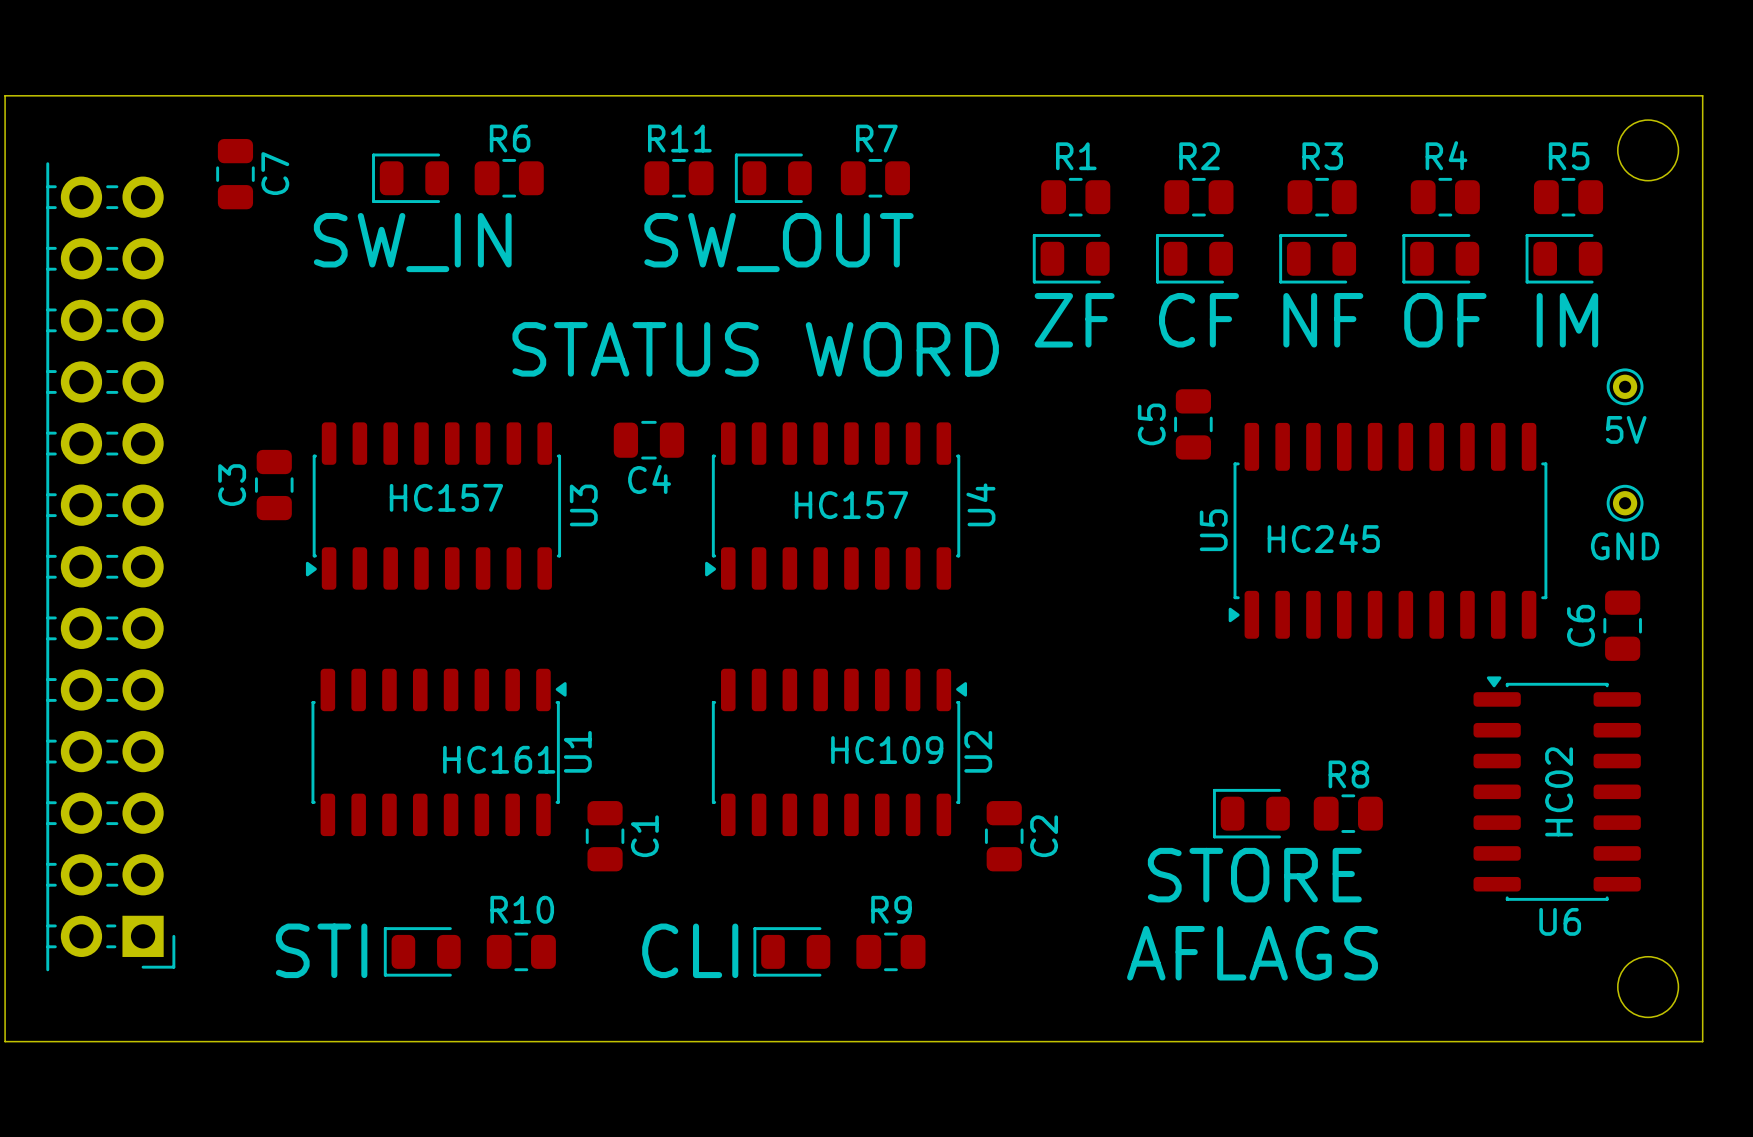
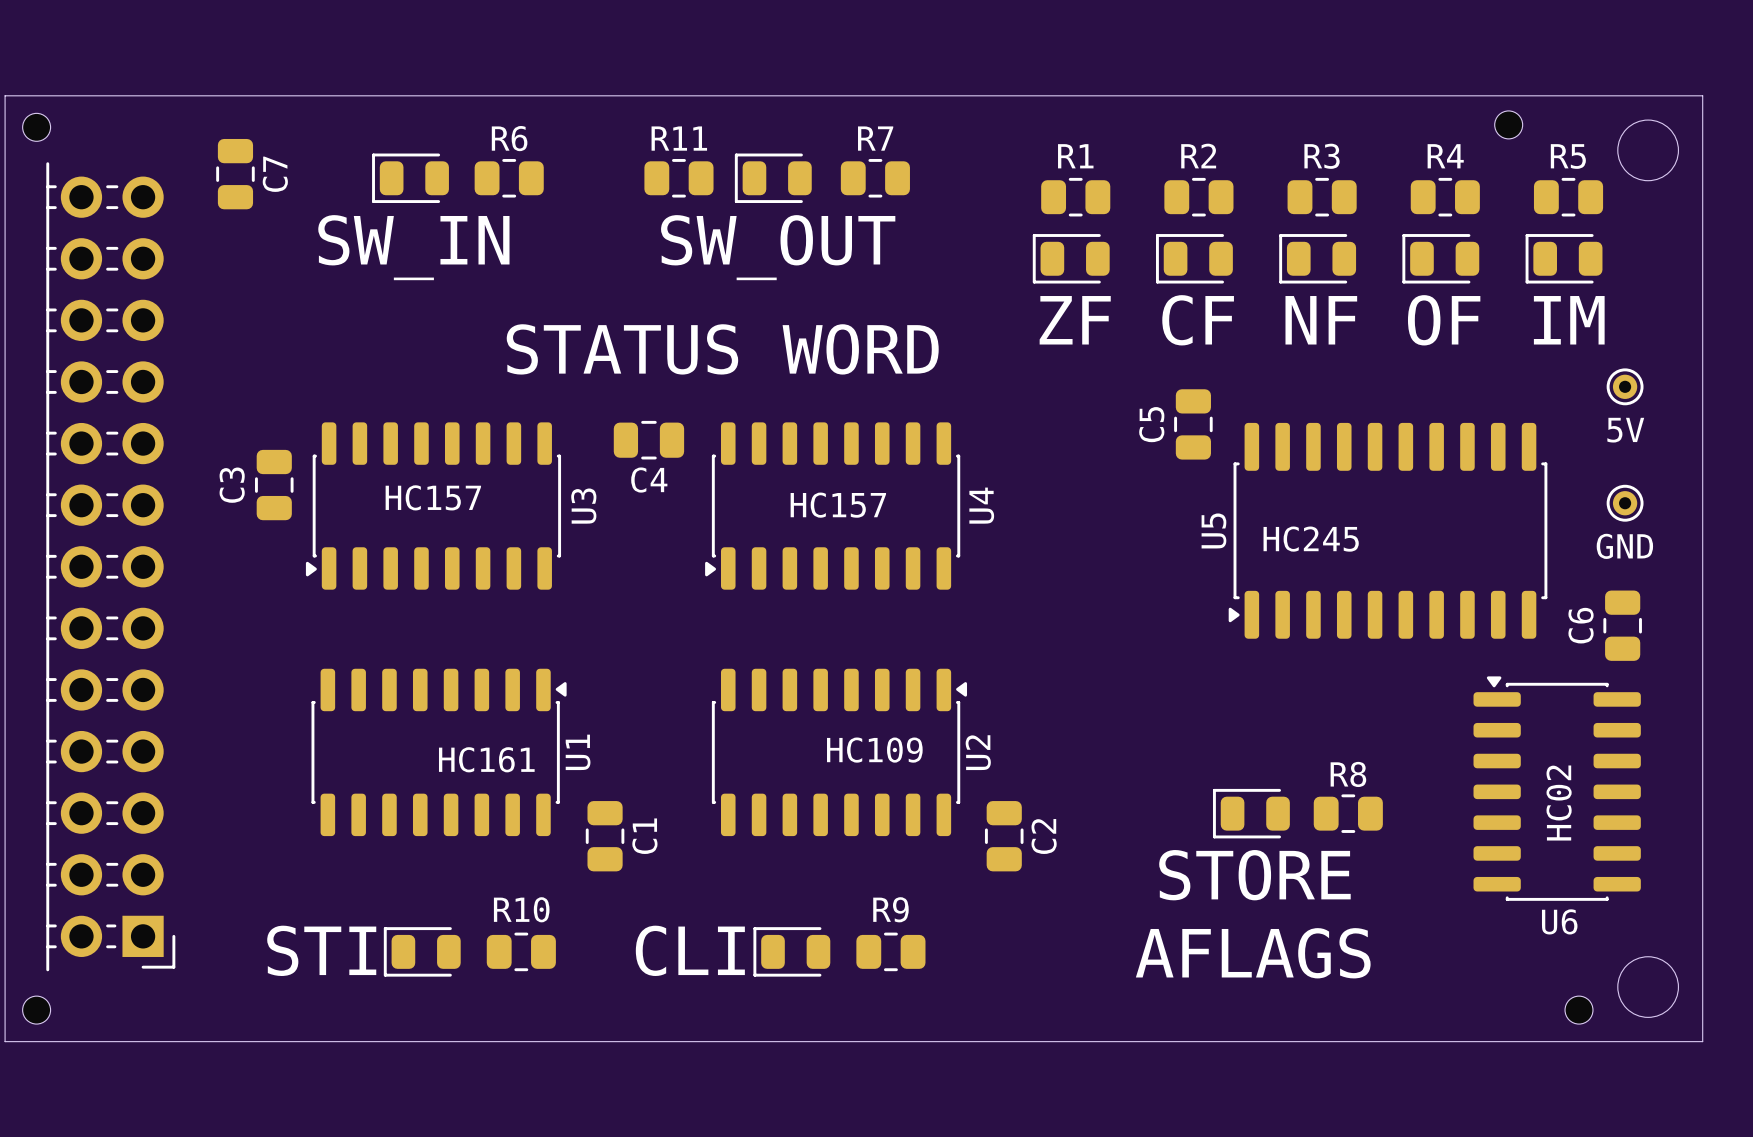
part: none -> (1508, 124)
part: none -> (36, 127)
part: none -> (36, 1010)
part: none -> (1579, 1010)

